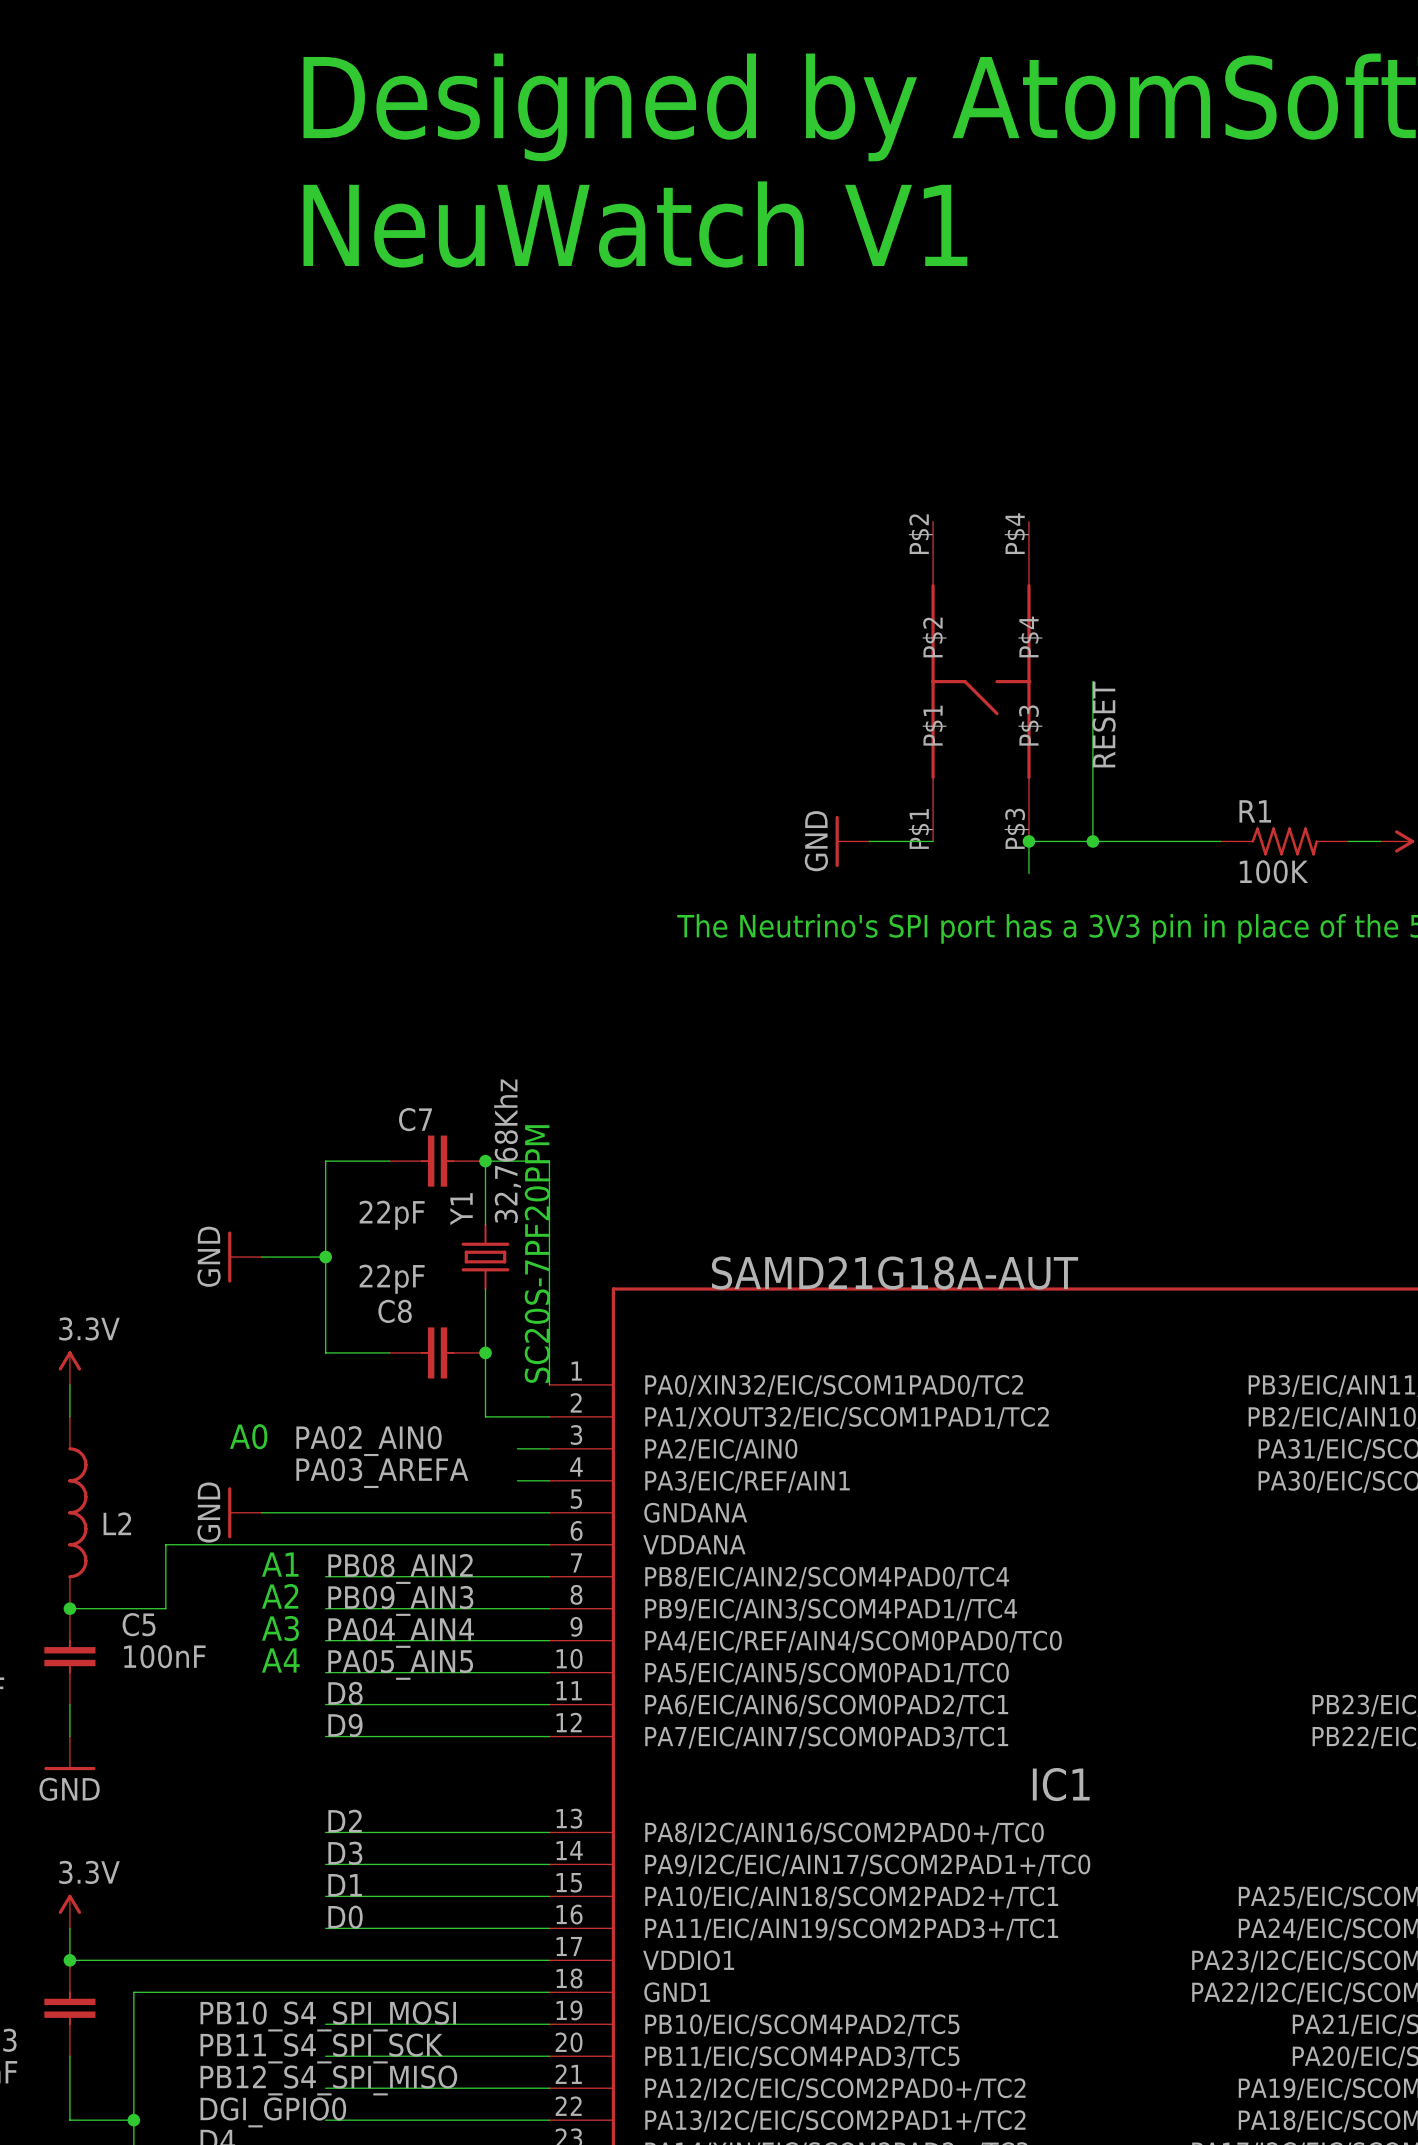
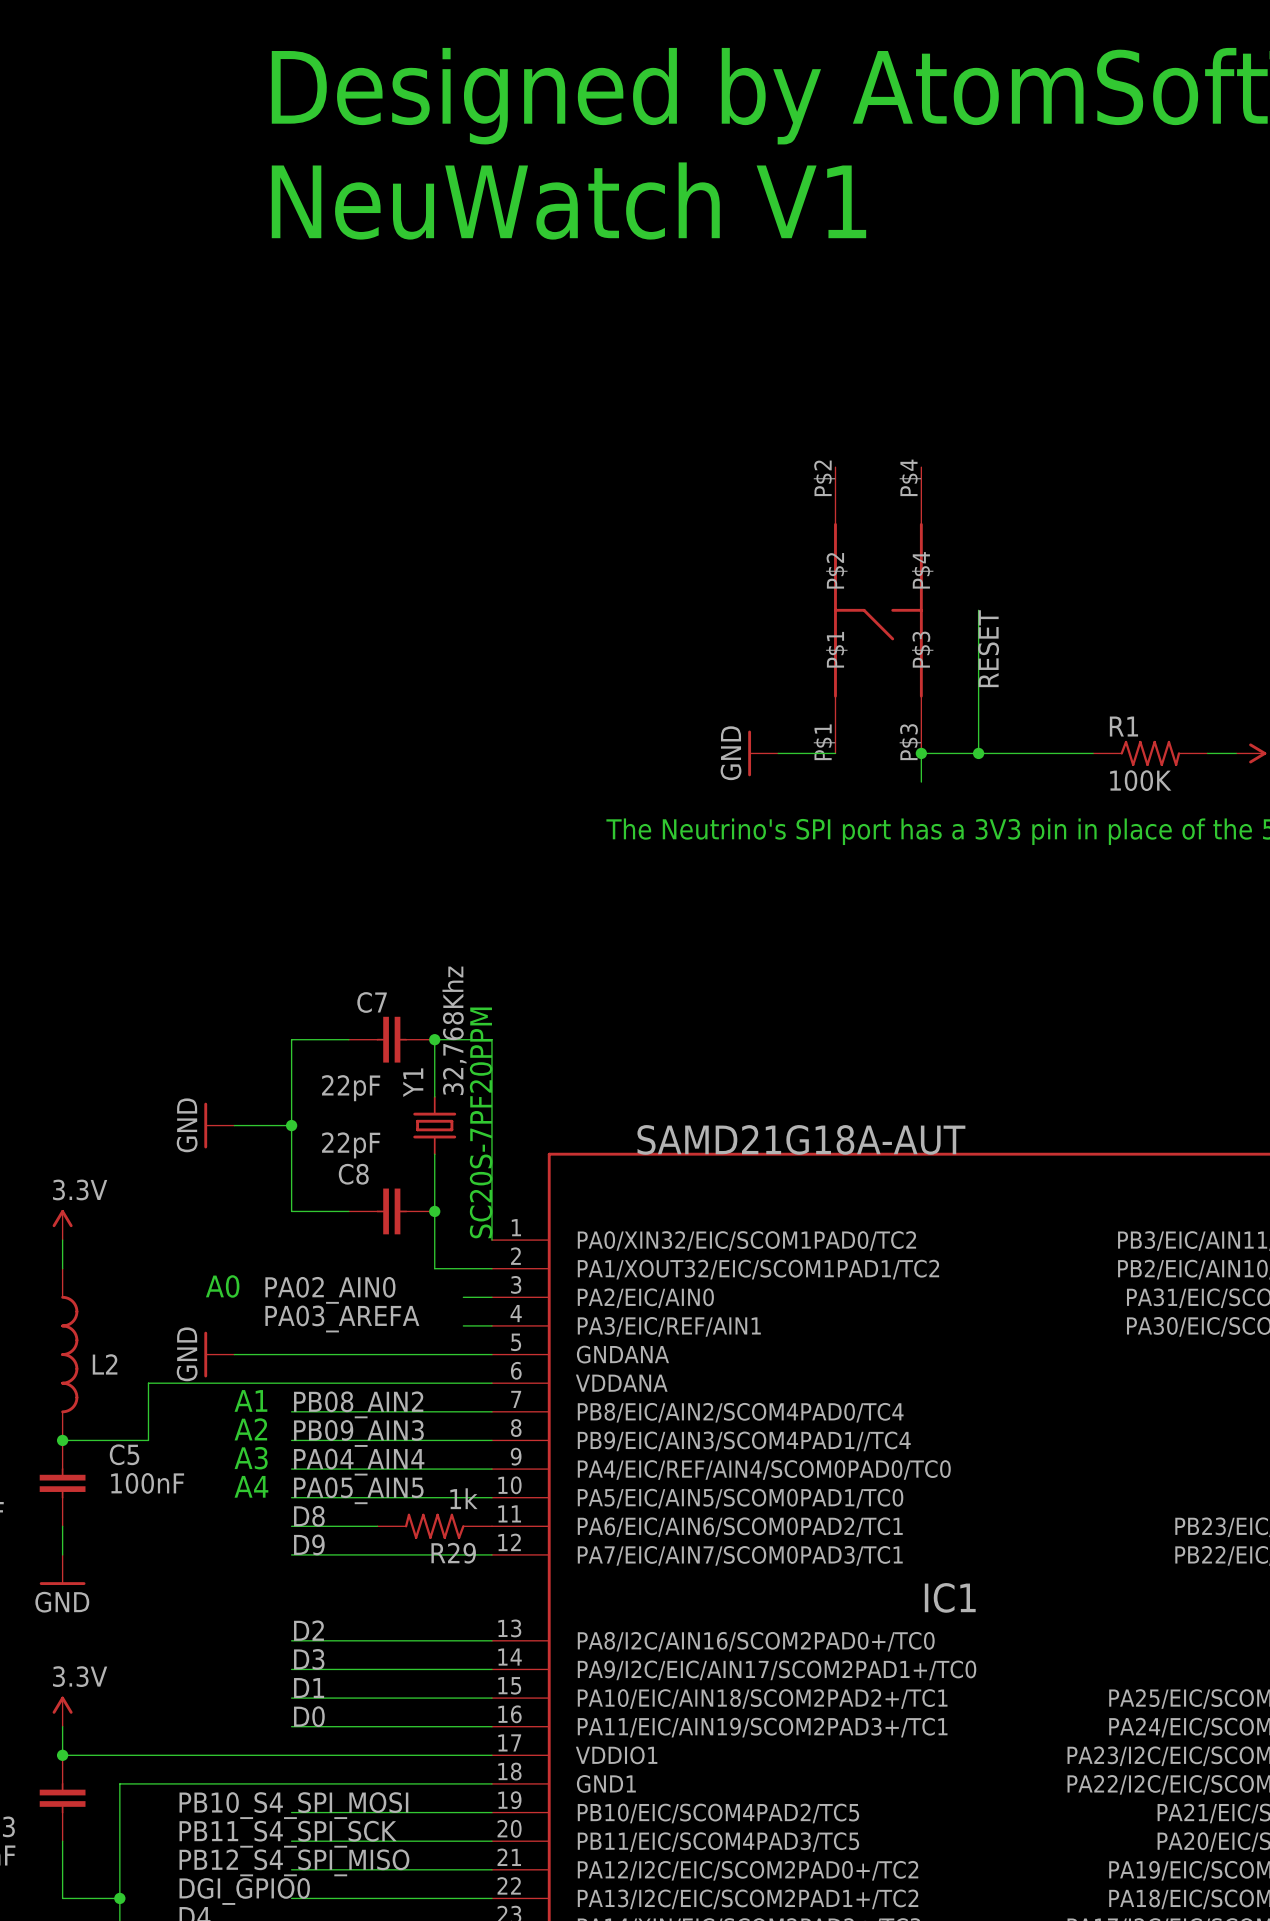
R29: none -> 1k (434, 1526)

